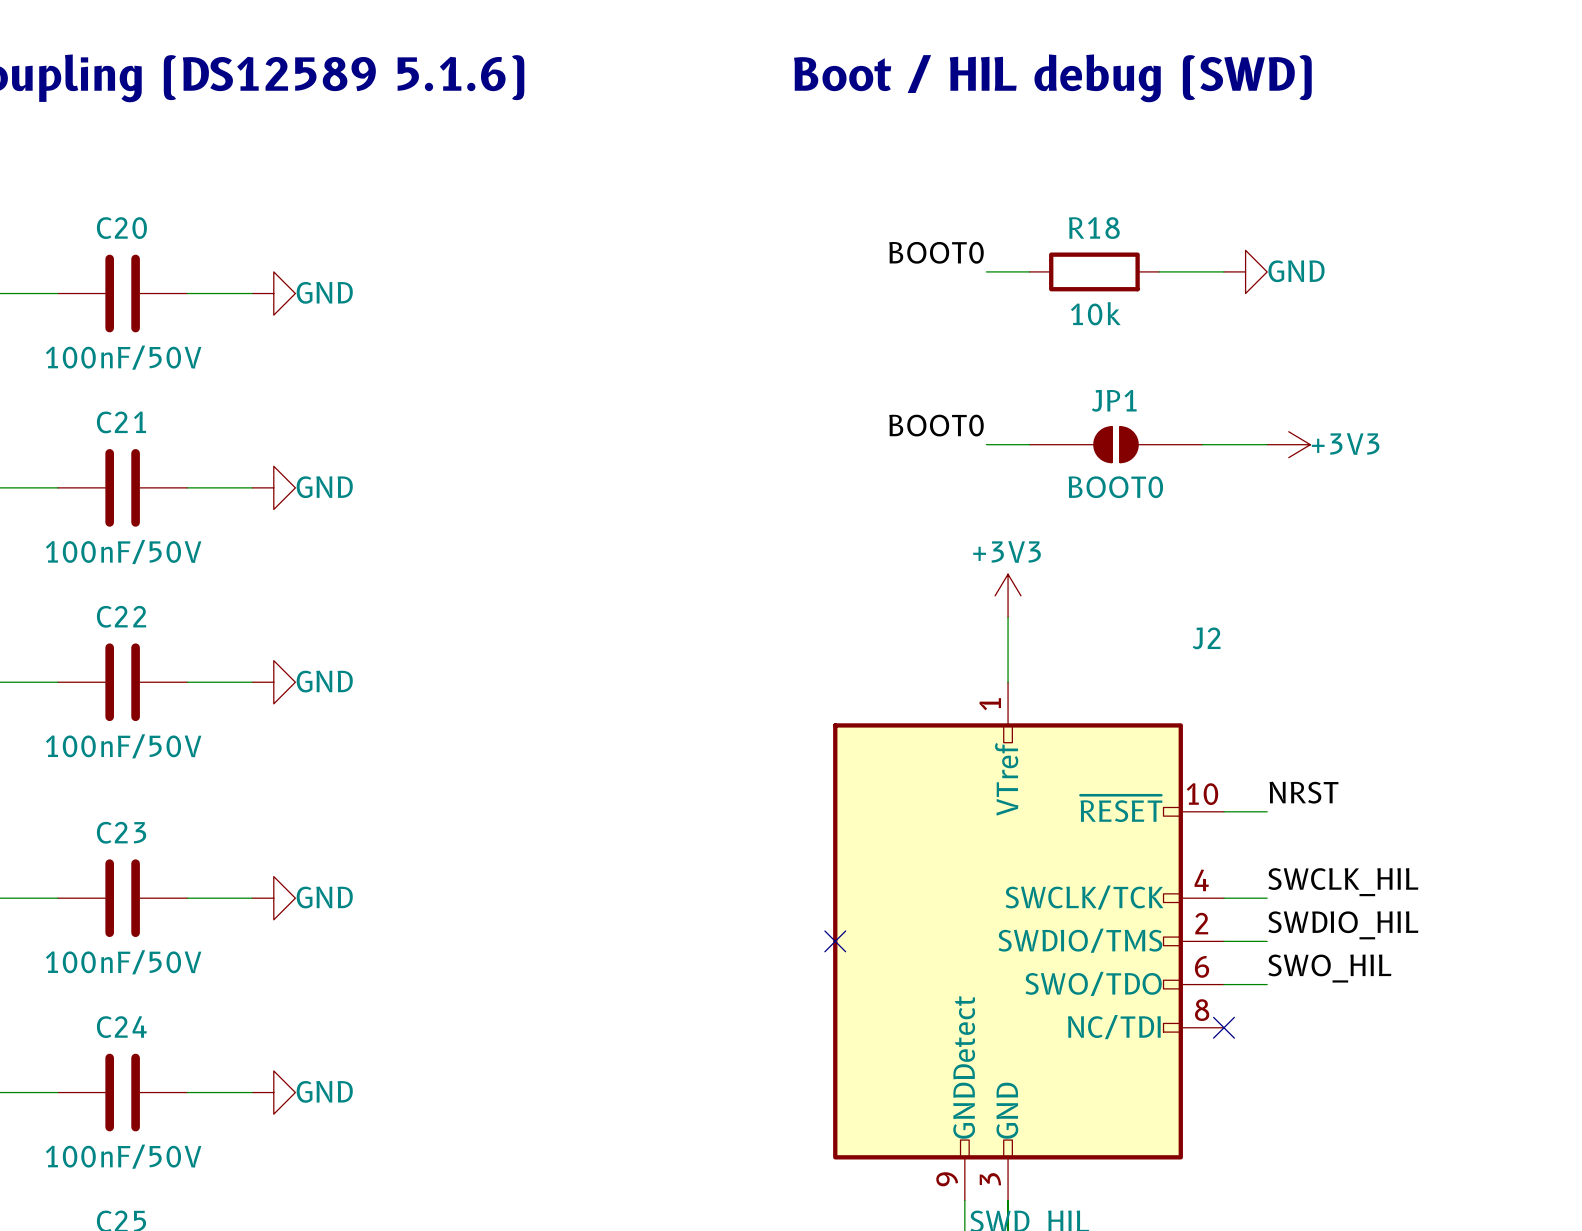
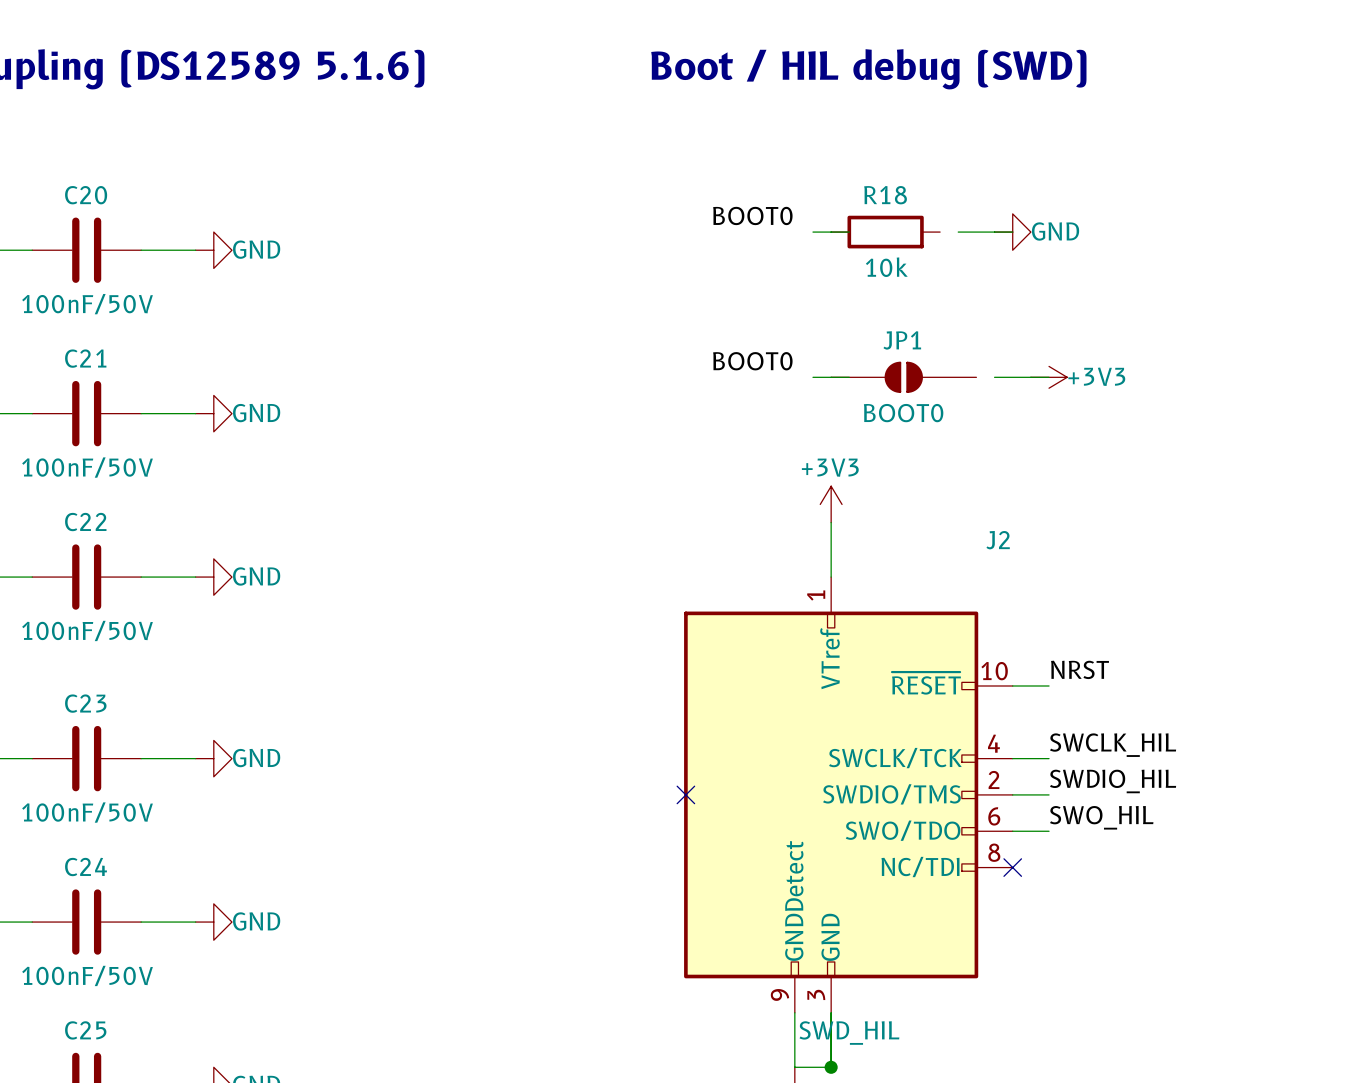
label position: BOOT0 (936, 252) -> BOOT0 (752, 215)
R18 position: (1094, 271) -> (885, 232)
power symbol position: GND (1245, 271) -> GND (1012, 232)
label position: BOOT0 (936, 425) -> BOOT0 (752, 361)
JP1 position: (1116, 444) -> (903, 377)
power symbol position: +3V3 (1288, 444) -> +3V3 (1049, 377)

